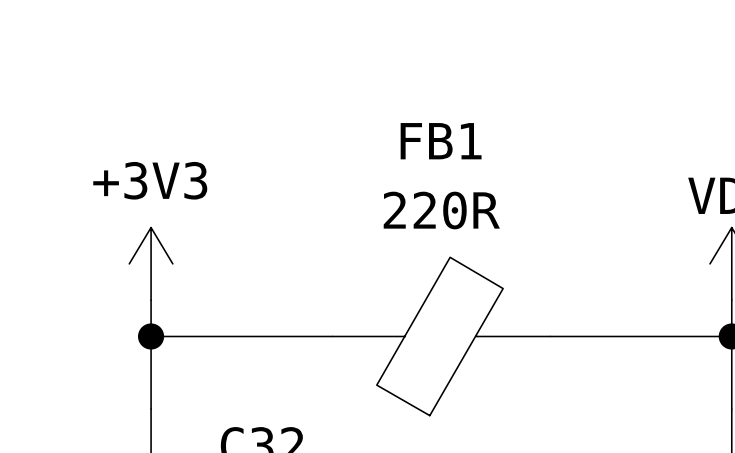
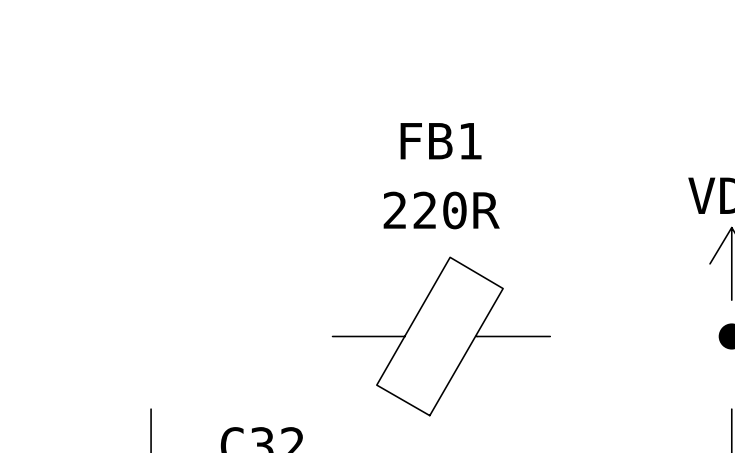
power symbol: +3V3 (151, 263) -> none
wire: (151, 300) (151, 409) -> none
wire: (731, 300) (731, 409) -> none
wire: (151, 336) (332, 336) -> none
junction: (151, 336) -> none
wire: (550, 336) (731, 336) -> none

